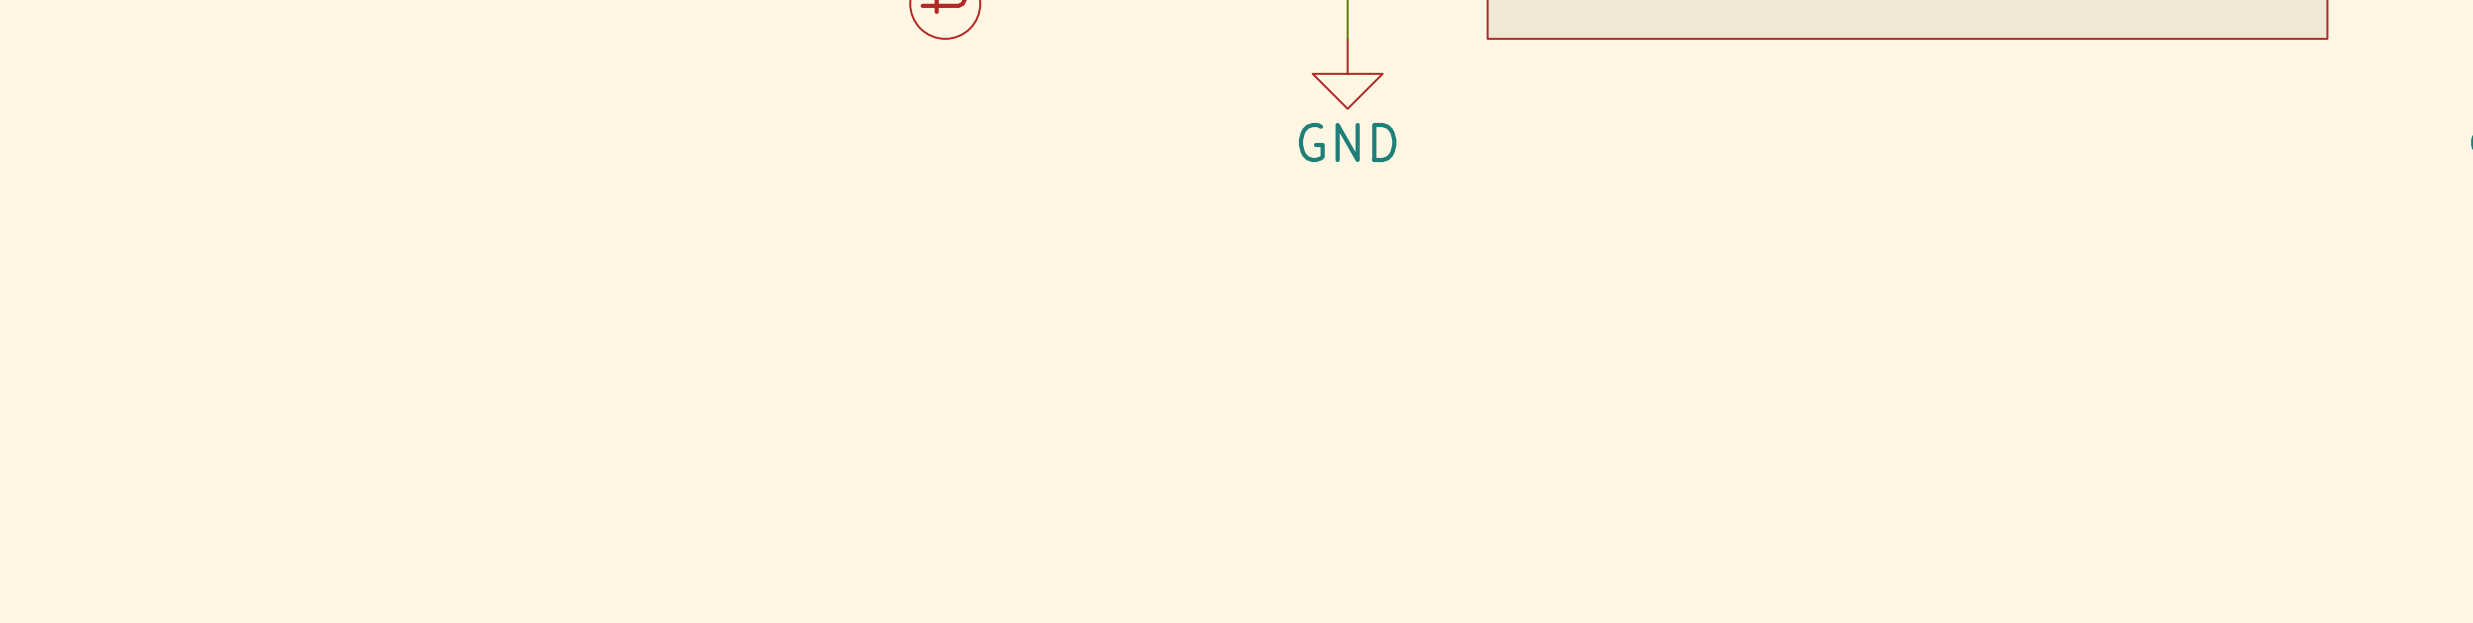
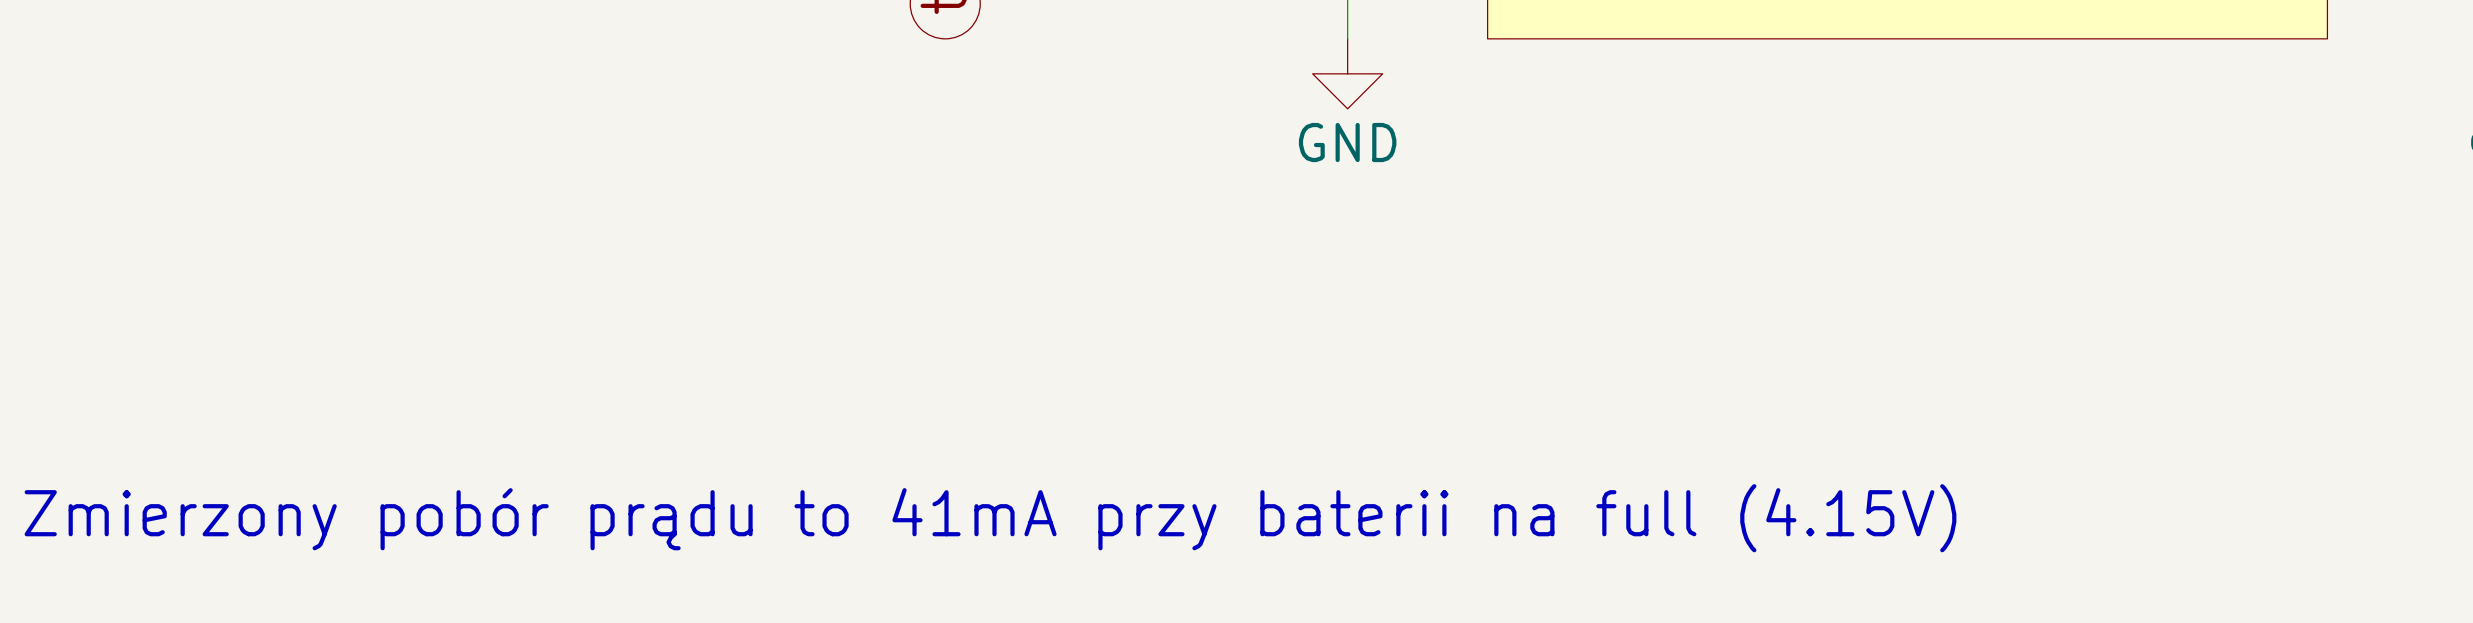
text: none -> Zmierzony pobór prądu to 41mA przy baterii na full (4.15V) (990, 518)

